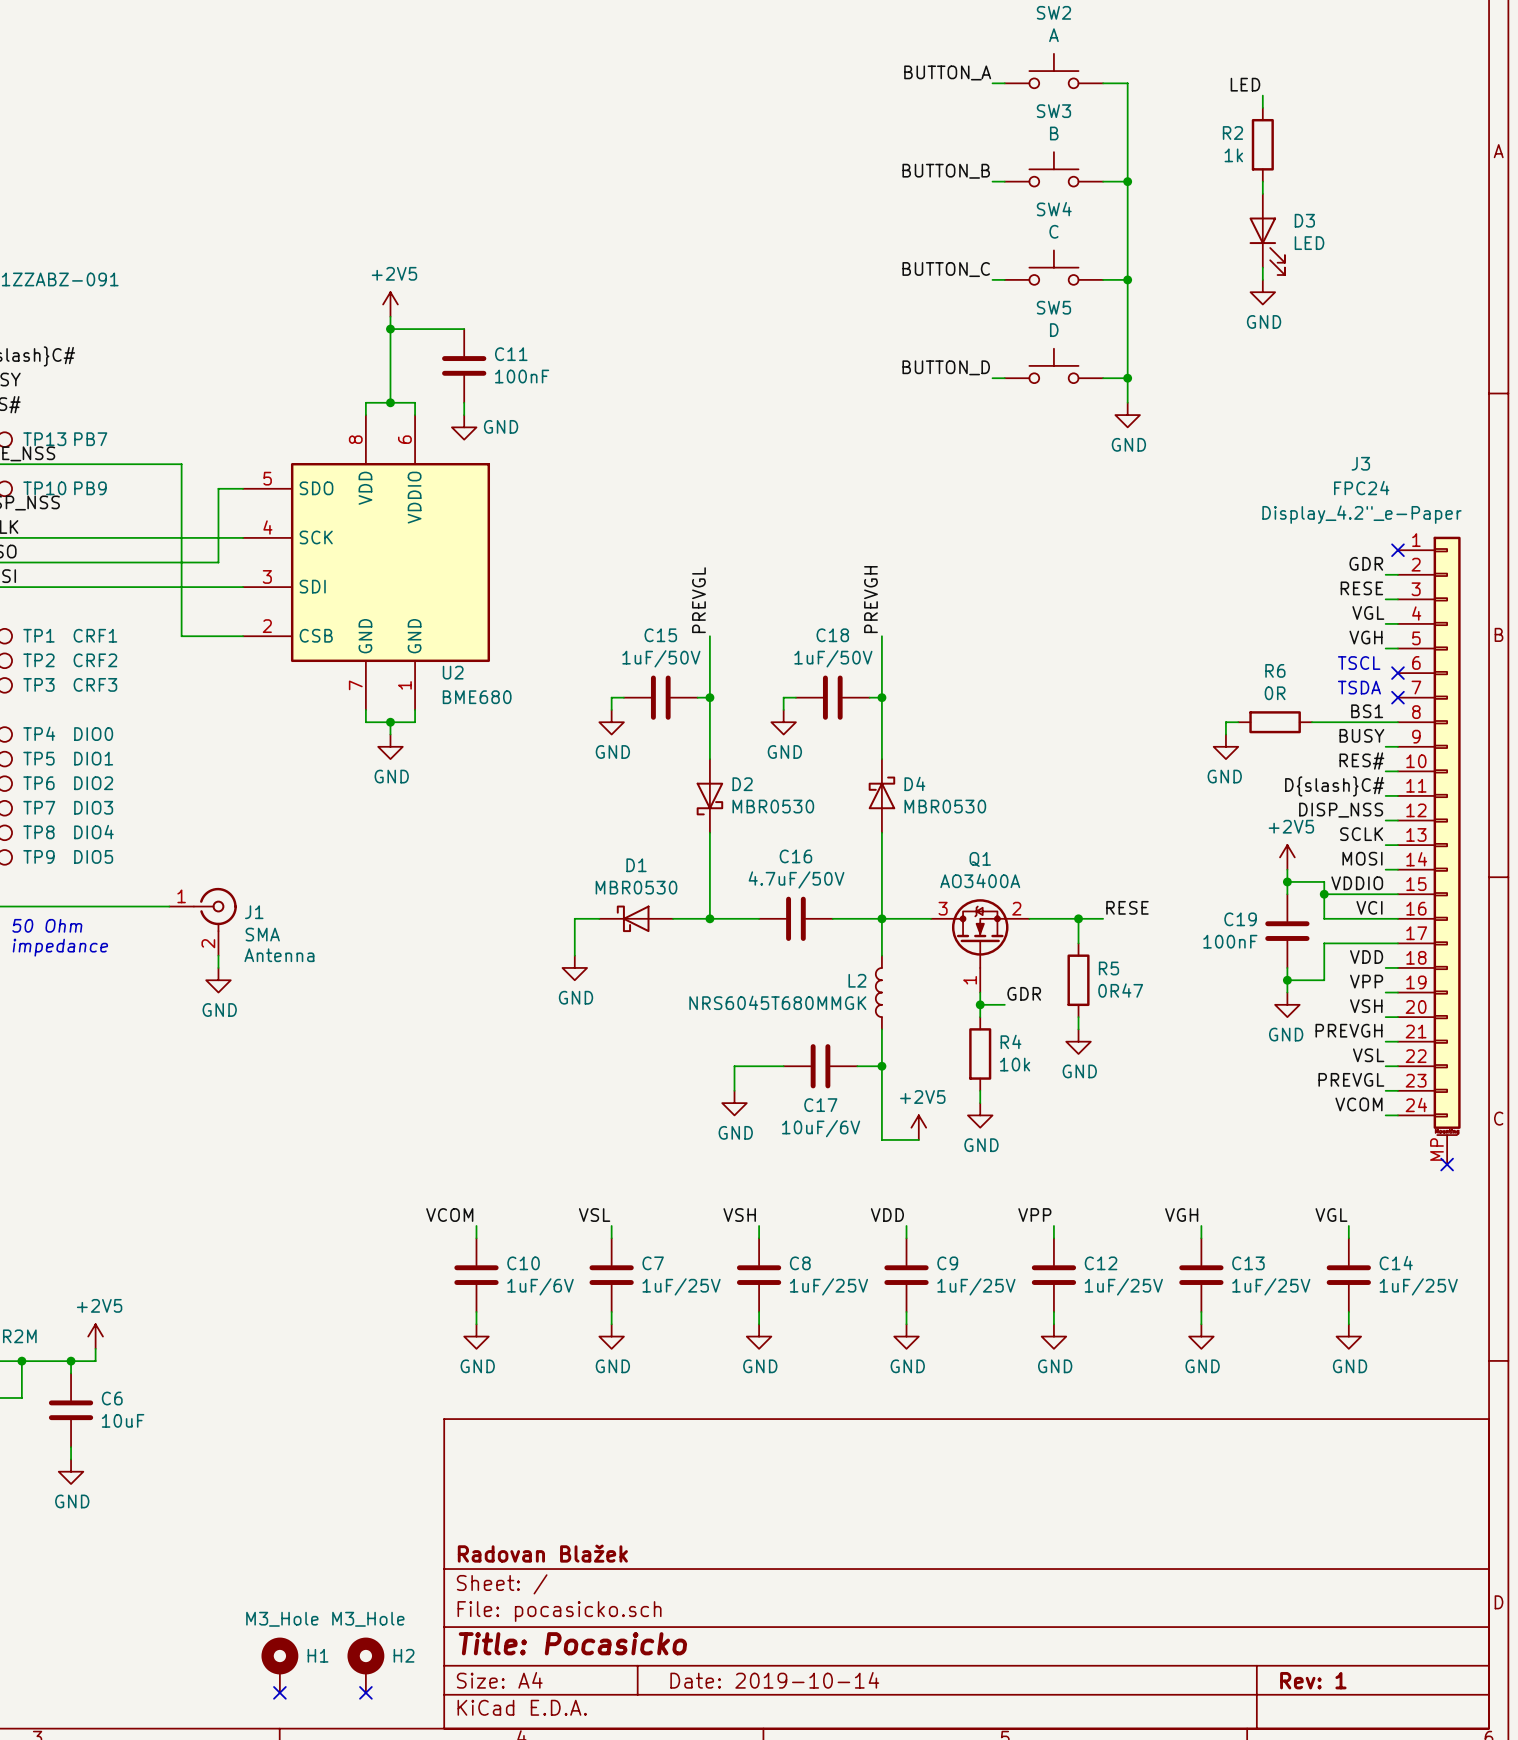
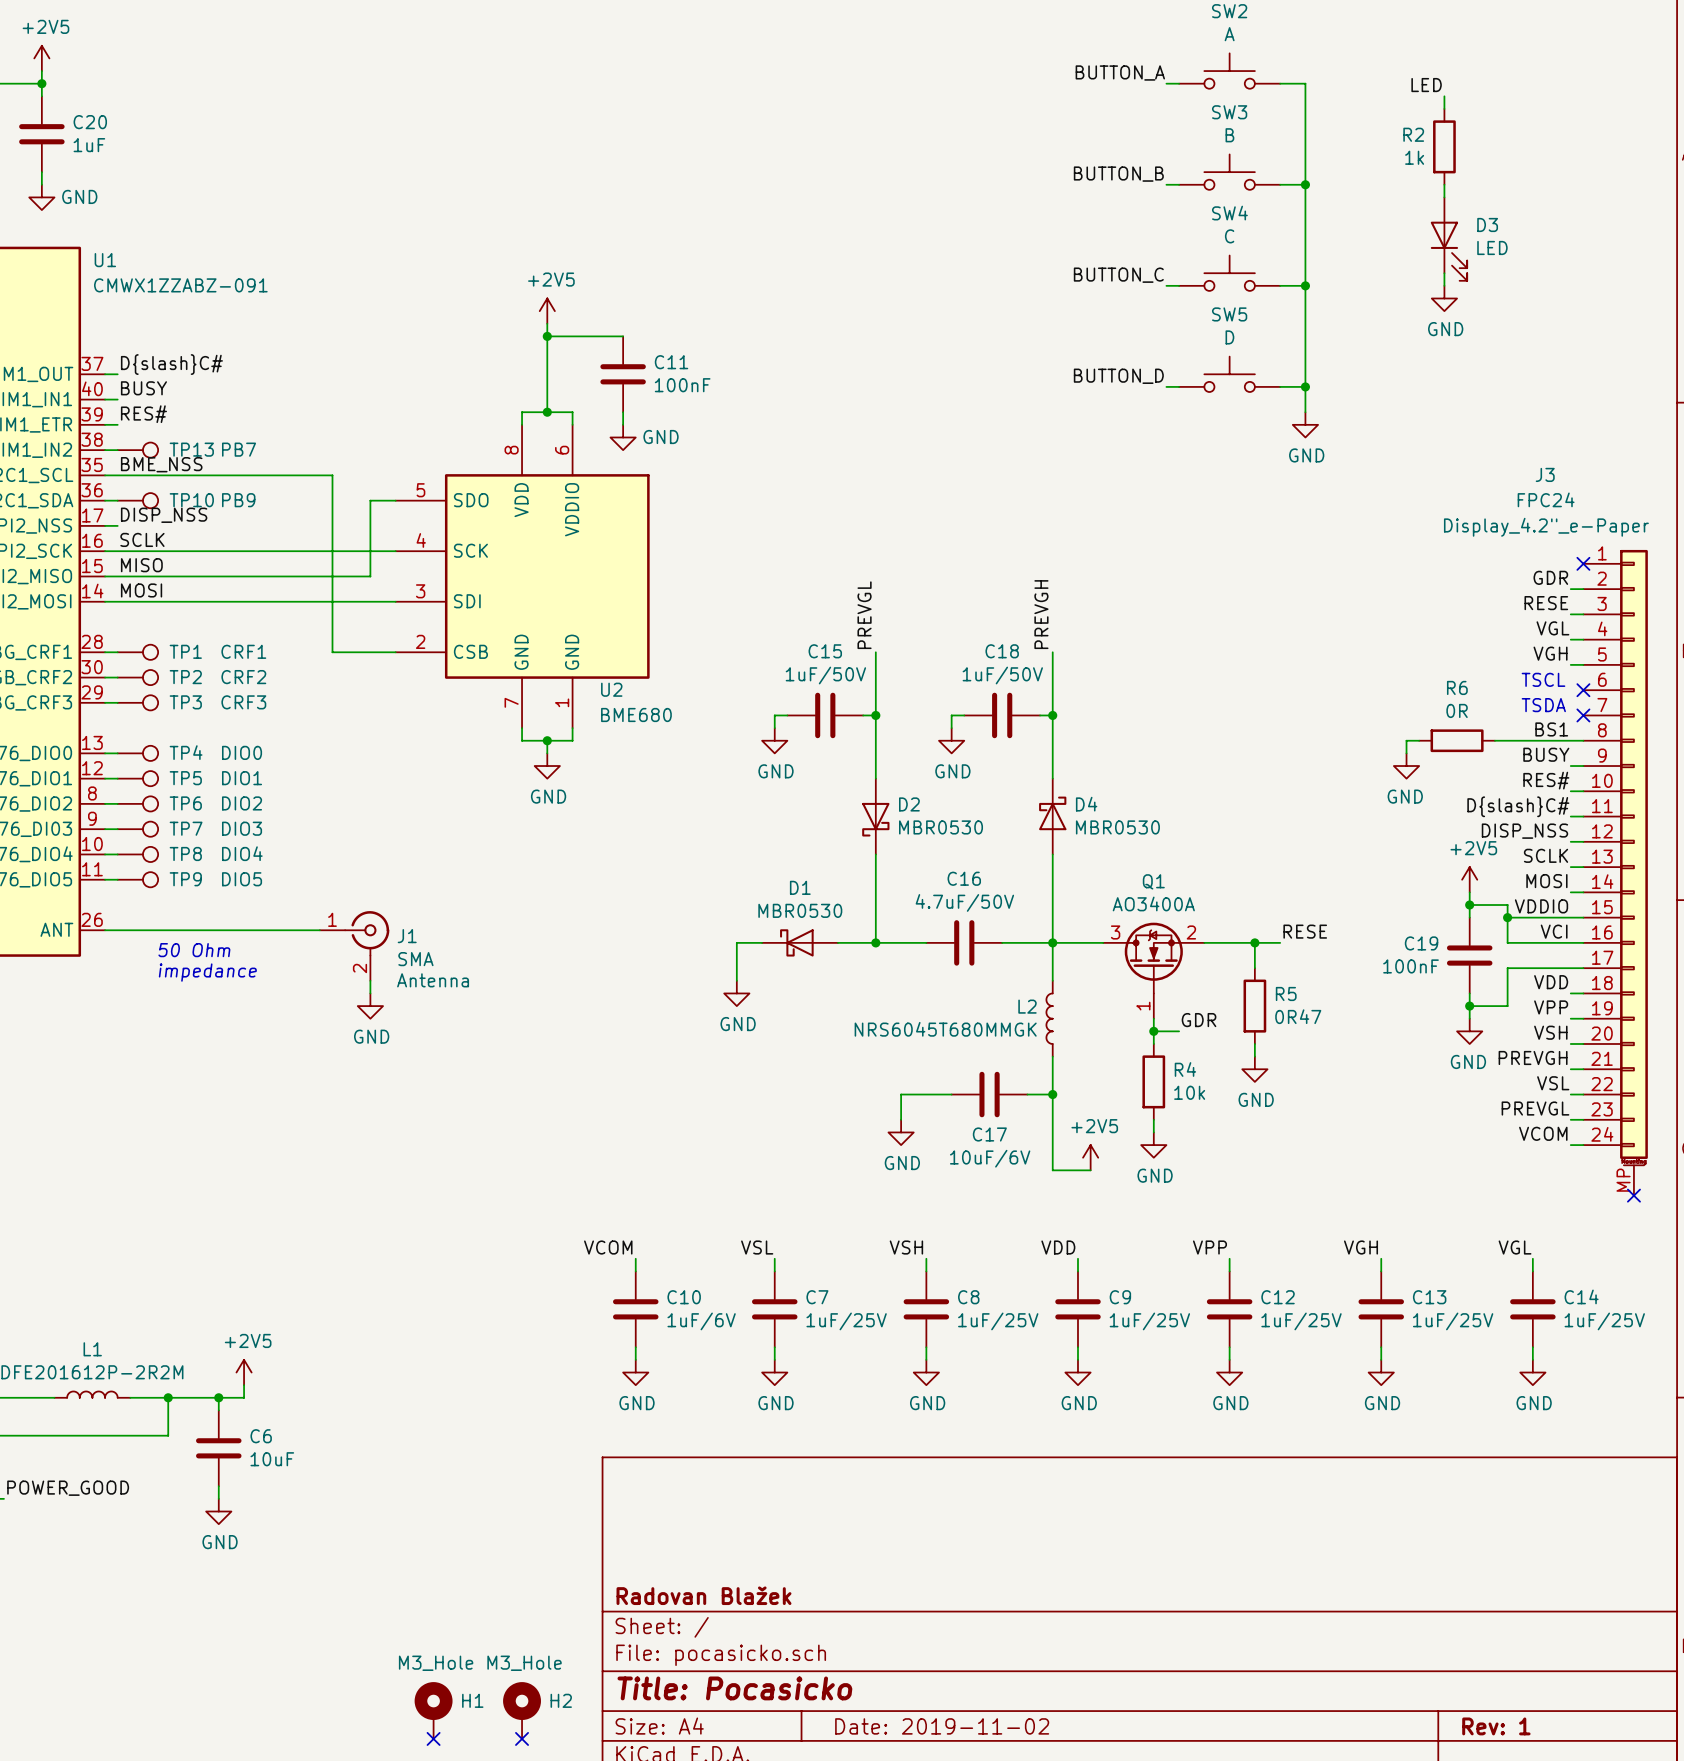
title block: Date: 2019-10-14 (774, 1680) -> Date: 2019-11-02 (942, 1726)

